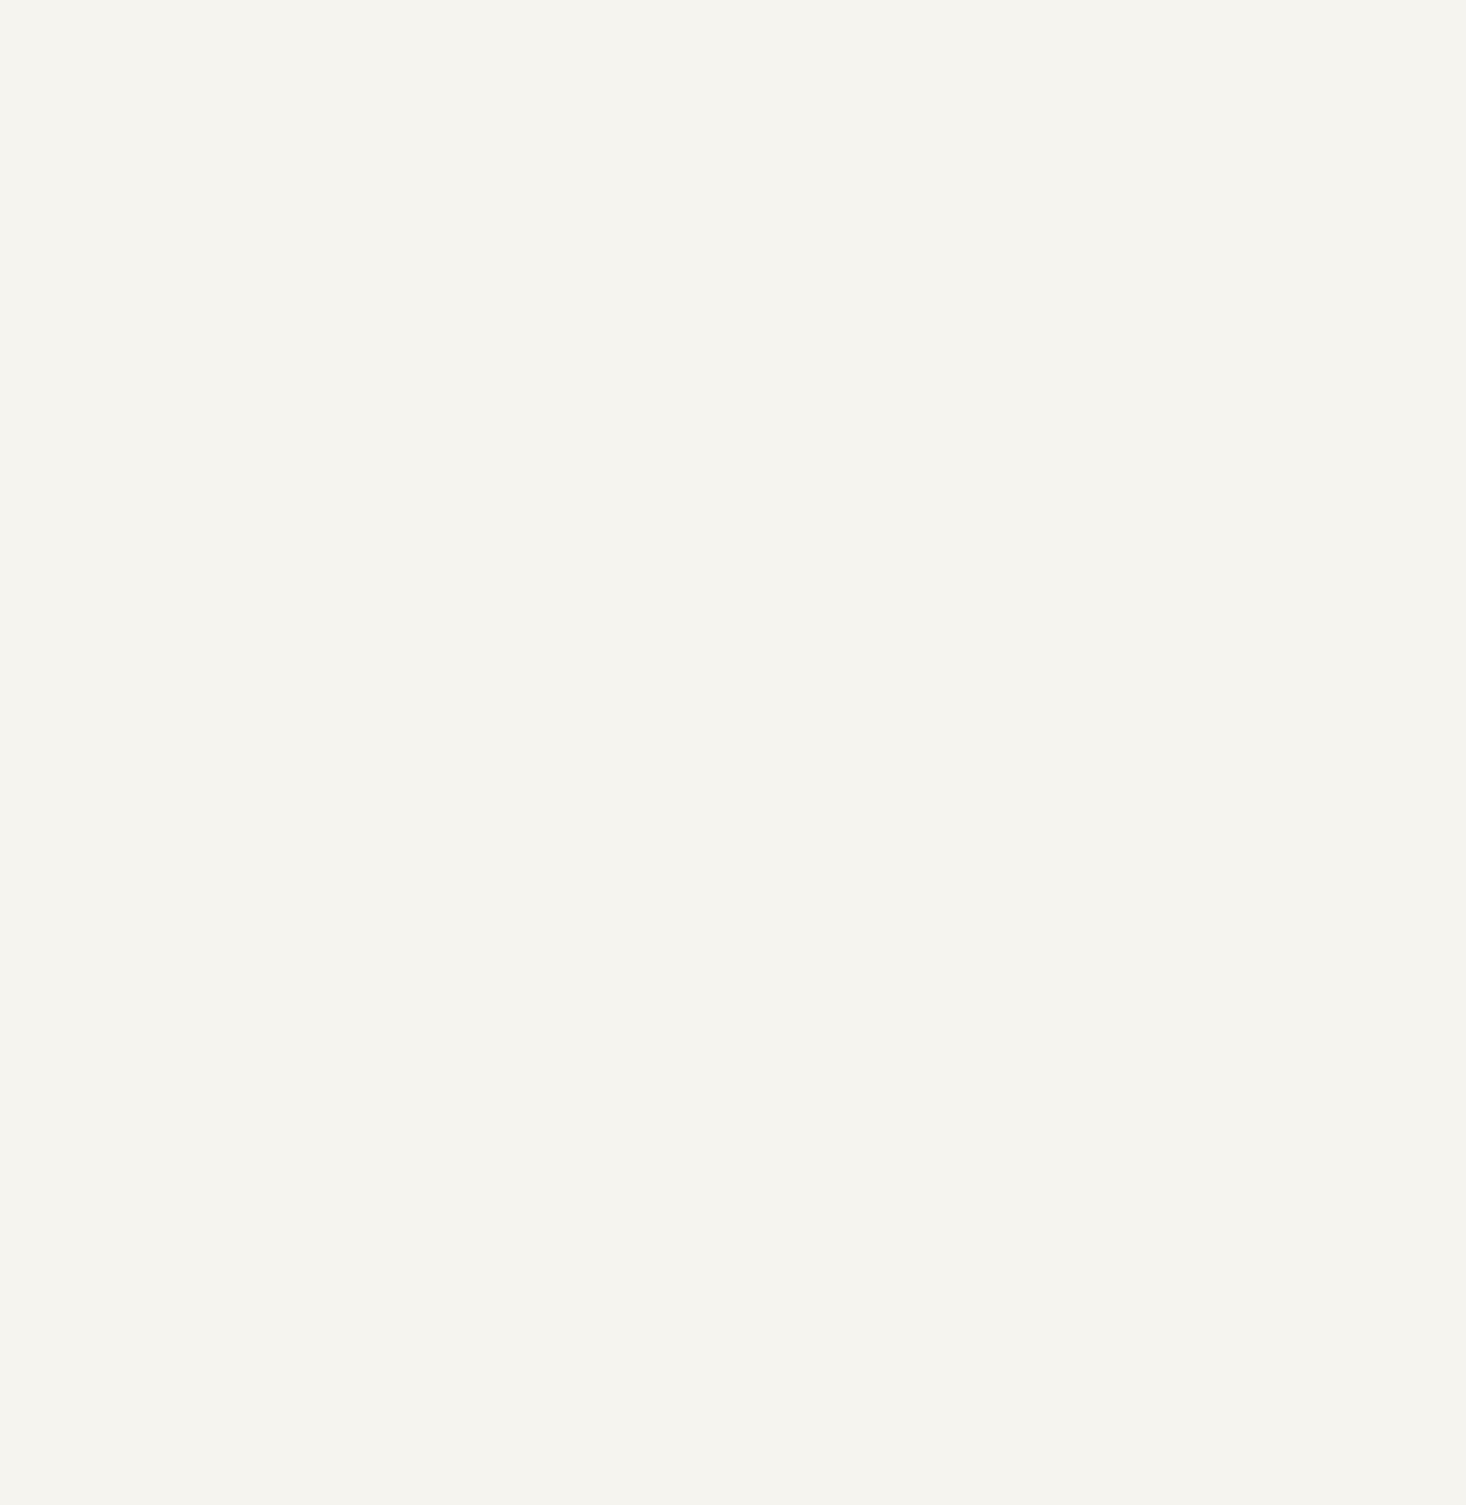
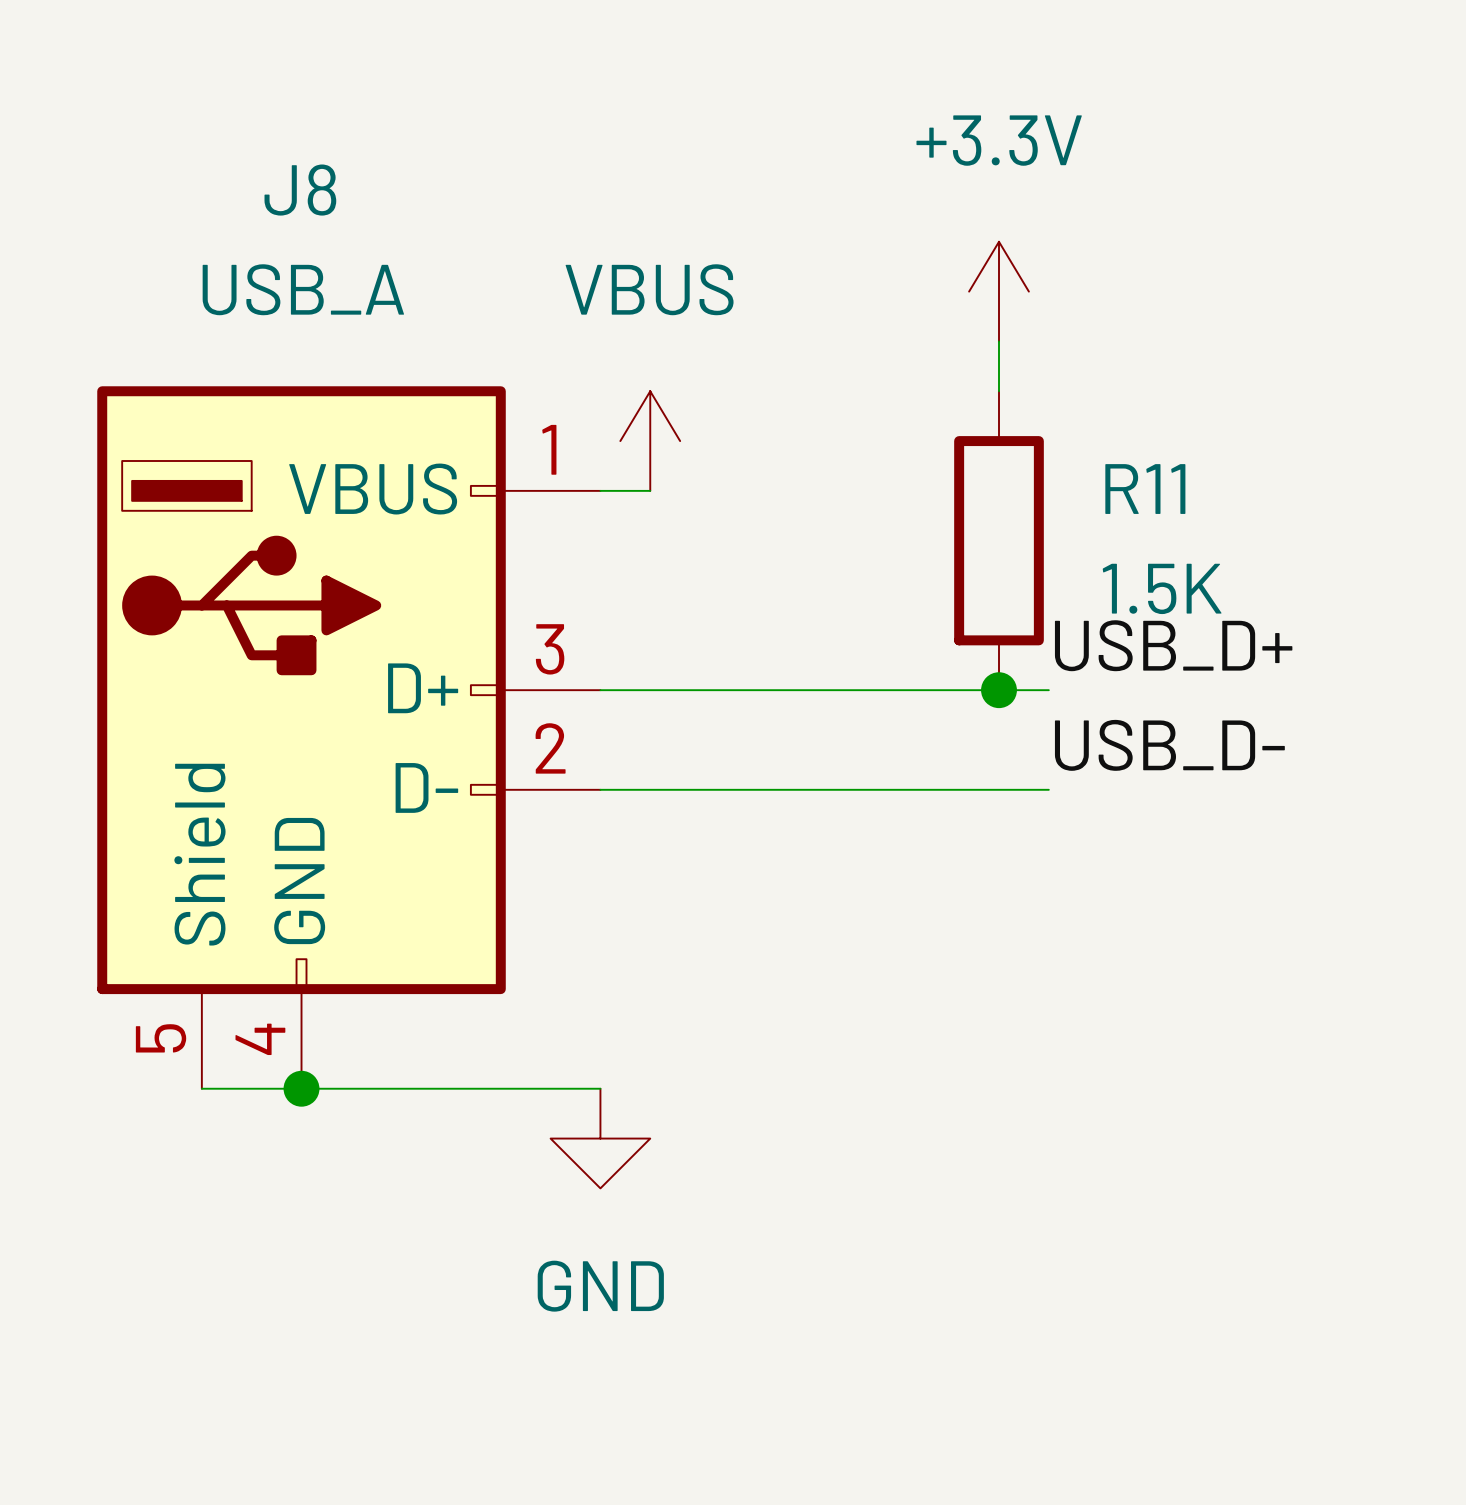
power symbol: none -> +3.3V (999, 291)
wire: none -> (999, 341) (999, 391)
power symbol: none -> VBUS (650, 441)
wire: none -> (600, 490) (650, 490)
R11: none -> 1.5K (999, 540)
label: none -> USB_D+ (1173, 645)
wire: none -> (600, 690) (1048, 690)
junction: none -> (999, 690)
J8: none -> USB_A (348, 737)
label: none -> USB_D- (1169, 745)
wire: none -> (600, 789) (1048, 789)
wire: none -> (201, 1088) (600, 1088)
junction: none -> (301, 1088)
power symbol: none -> GND (600, 1138)

